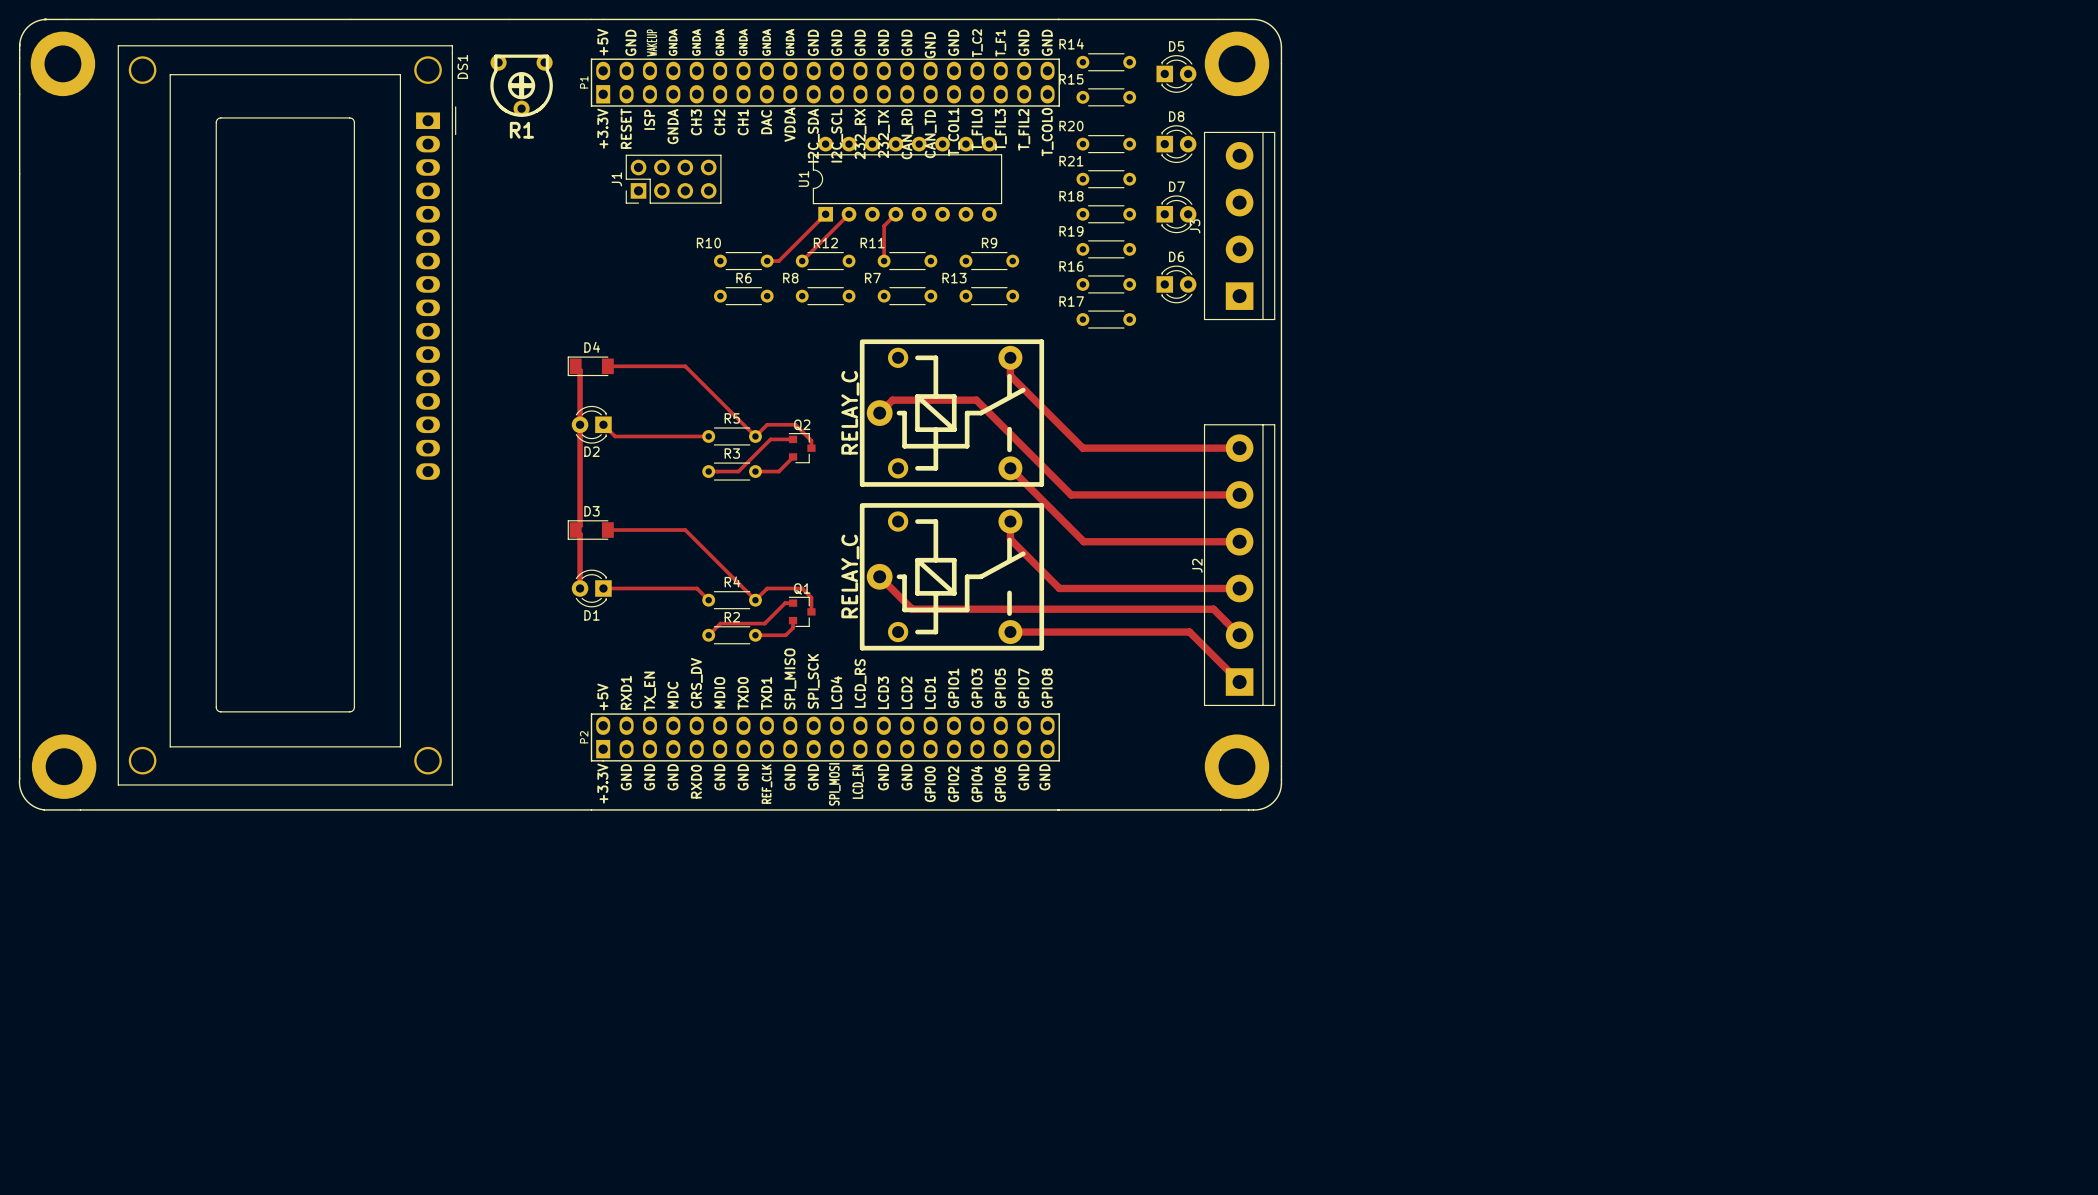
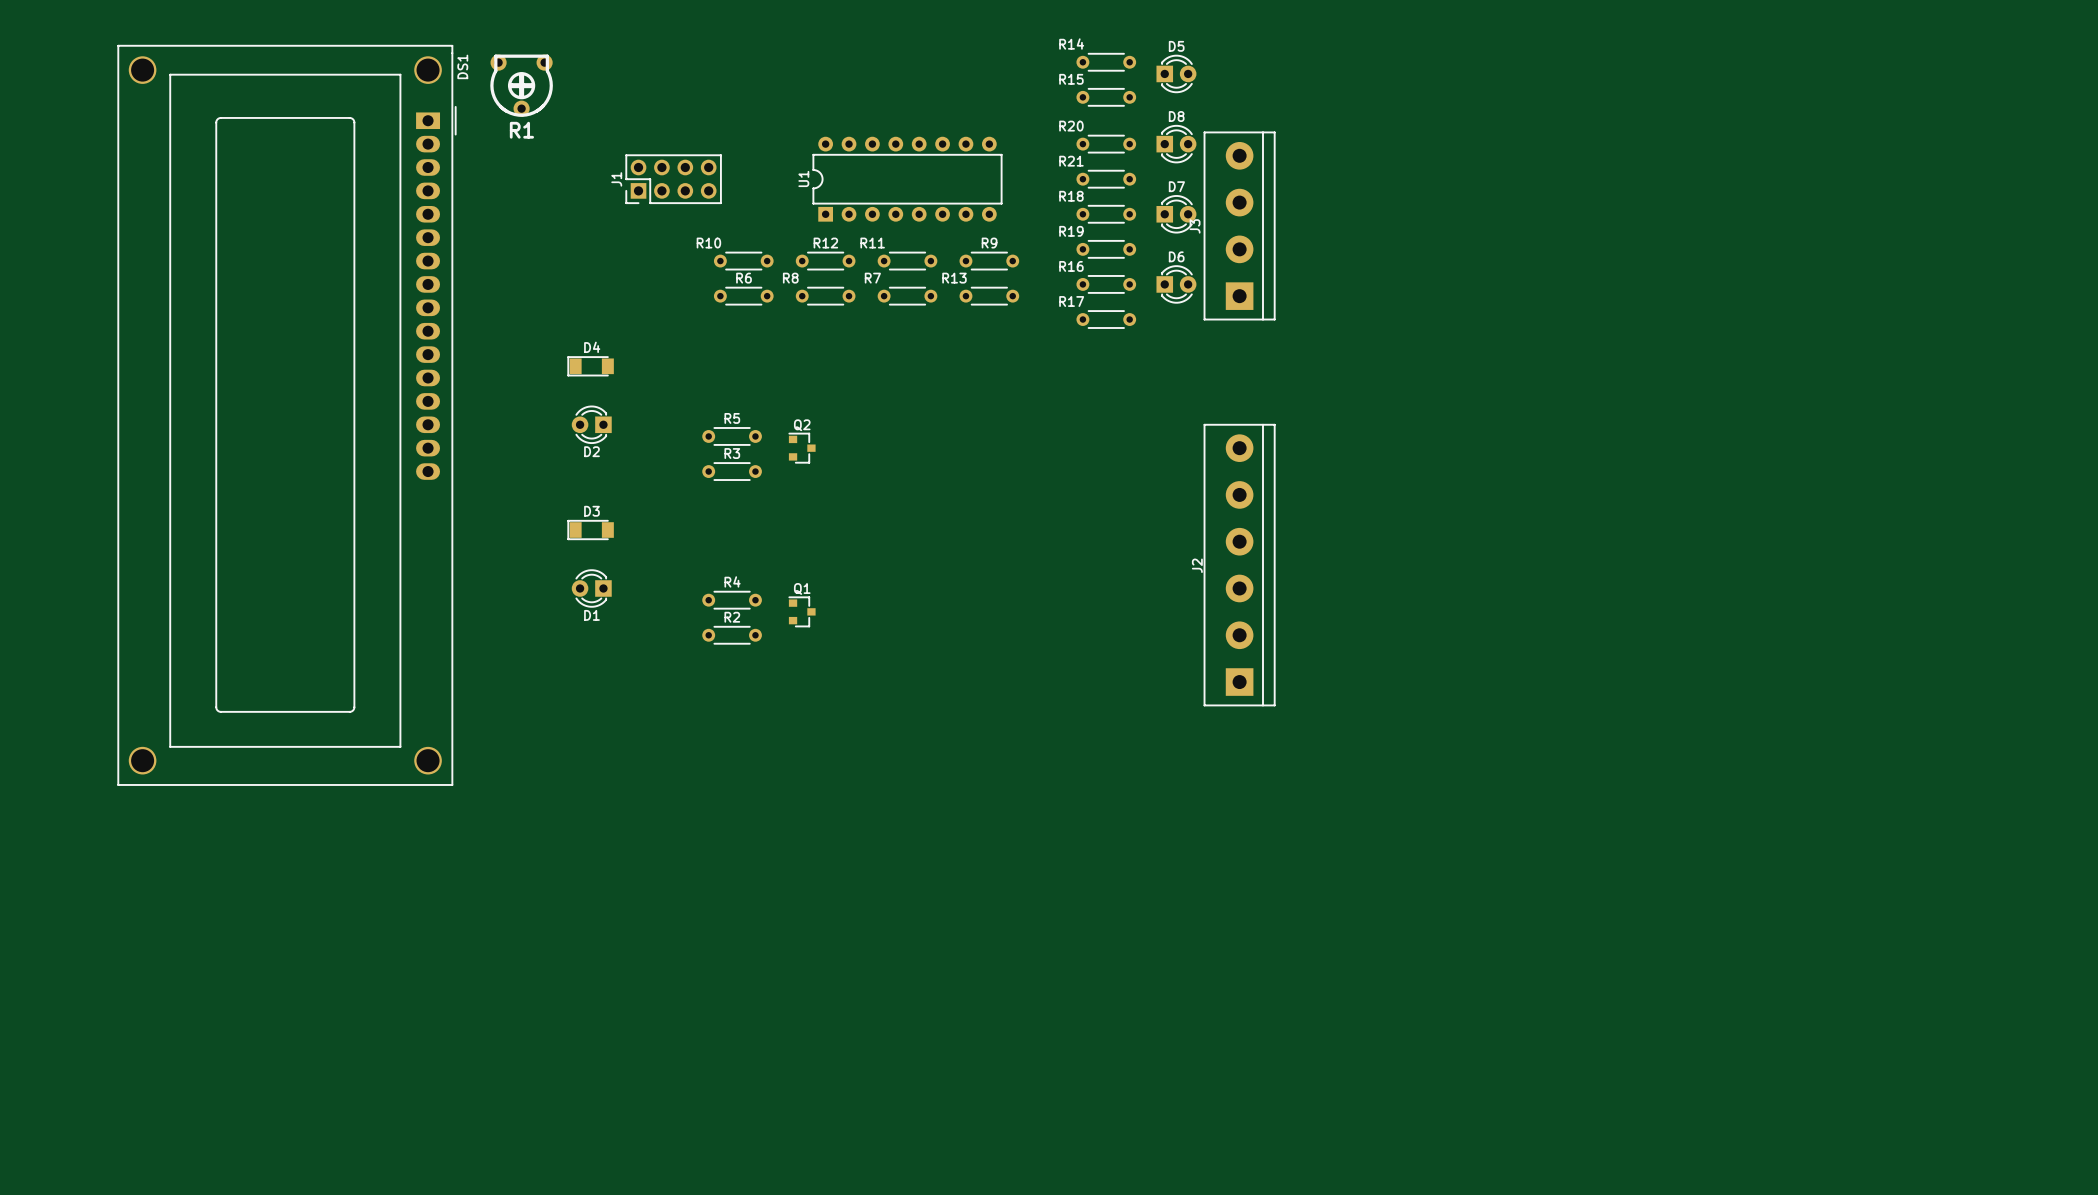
track: (825, 214) (778, 261) (767, 261) -> none
track: (849, 214) (802, 261) -> none
track: (895, 214) (884, 225) (884, 261) -> none
track: (1010, 357) (1010, 375) (1082, 448) (1239, 448) -> none
track: (575, 366) (580, 370) (580, 525) (575, 530) (580, 534) (580, 588) -> none
track: (607, 366) (685, 366) (755, 436) (767, 424) (795, 424) (811, 440) (811, 448) -> none
track: (879, 413) (892, 400) (976, 400) (1071, 494) (1239, 494) -> none
part: RELAY_C (951, 413) -> none
part: (650, 414) -> none
track: (603, 424) (615, 436) (708, 436) -> none
track: (793, 439) (770, 439) (738, 471) (708, 471) -> none
track: (793, 456) (778, 471) (755, 471) -> none
track: (1010, 468) (1083, 541) (1239, 541) -> none
track: (1010, 521) (1010, 539) (1059, 588) (1239, 588) -> none
track: (607, 530) (685, 530) (755, 600) (767, 588) (802, 588) (811, 597) (811, 611) -> none
track: (879, 576) (912, 609) (1213, 609) (1239, 635) -> none
part: RELAY_C (951, 576) -> none
track: (603, 588) (697, 588) (708, 600) -> none
track: (793, 603) (785, 603) (764, 623) (720, 623) (708, 635) -> none
track: (793, 620) (793, 627) (785, 635) (755, 635) -> none
track: (1010, 632) (1189, 632) (1239, 682) -> none

